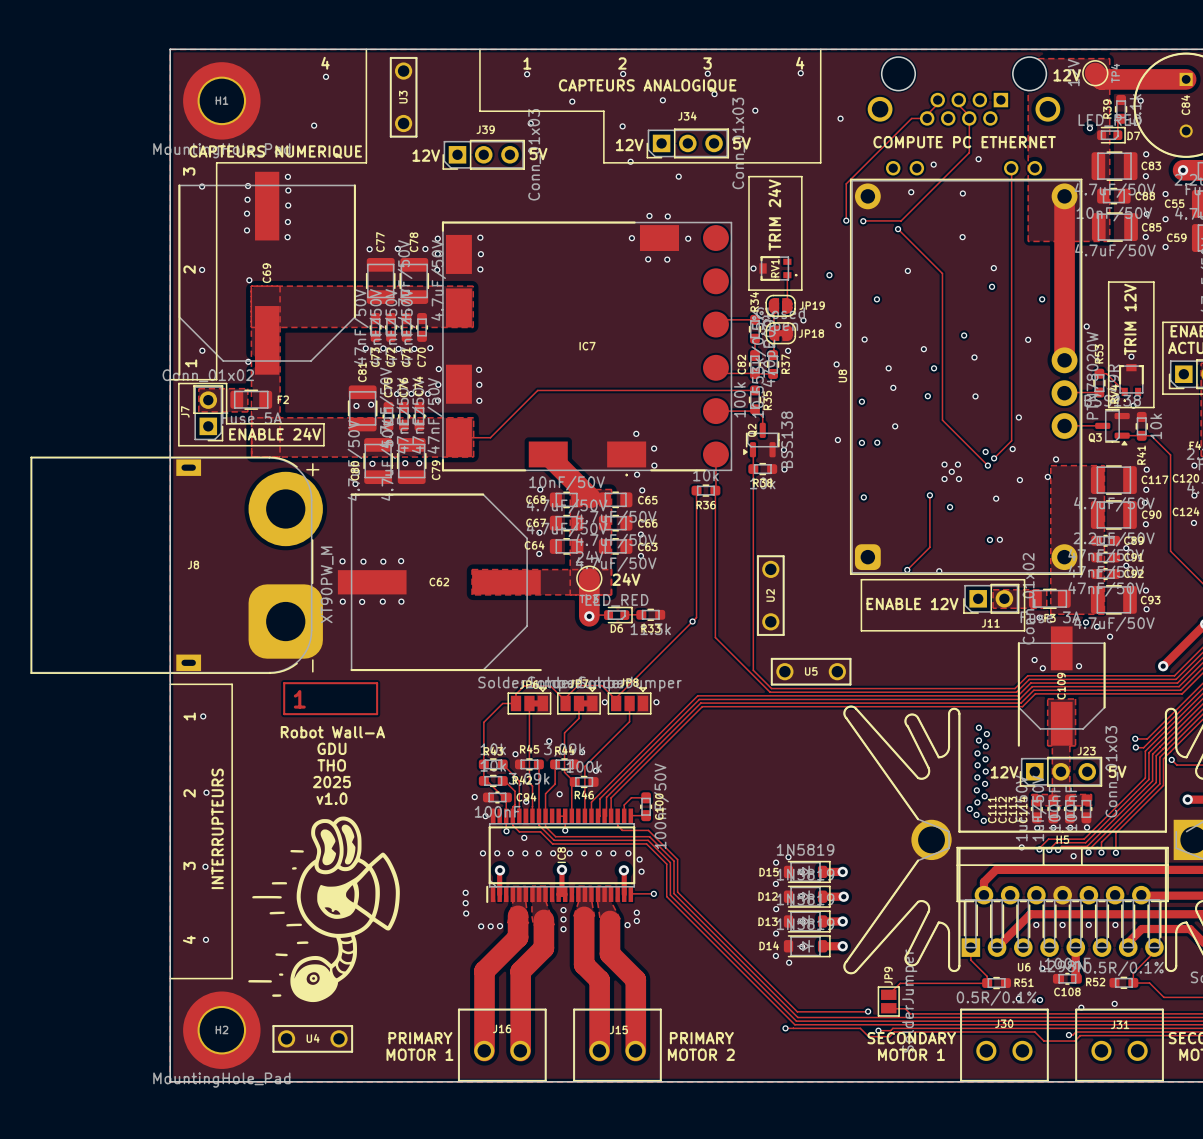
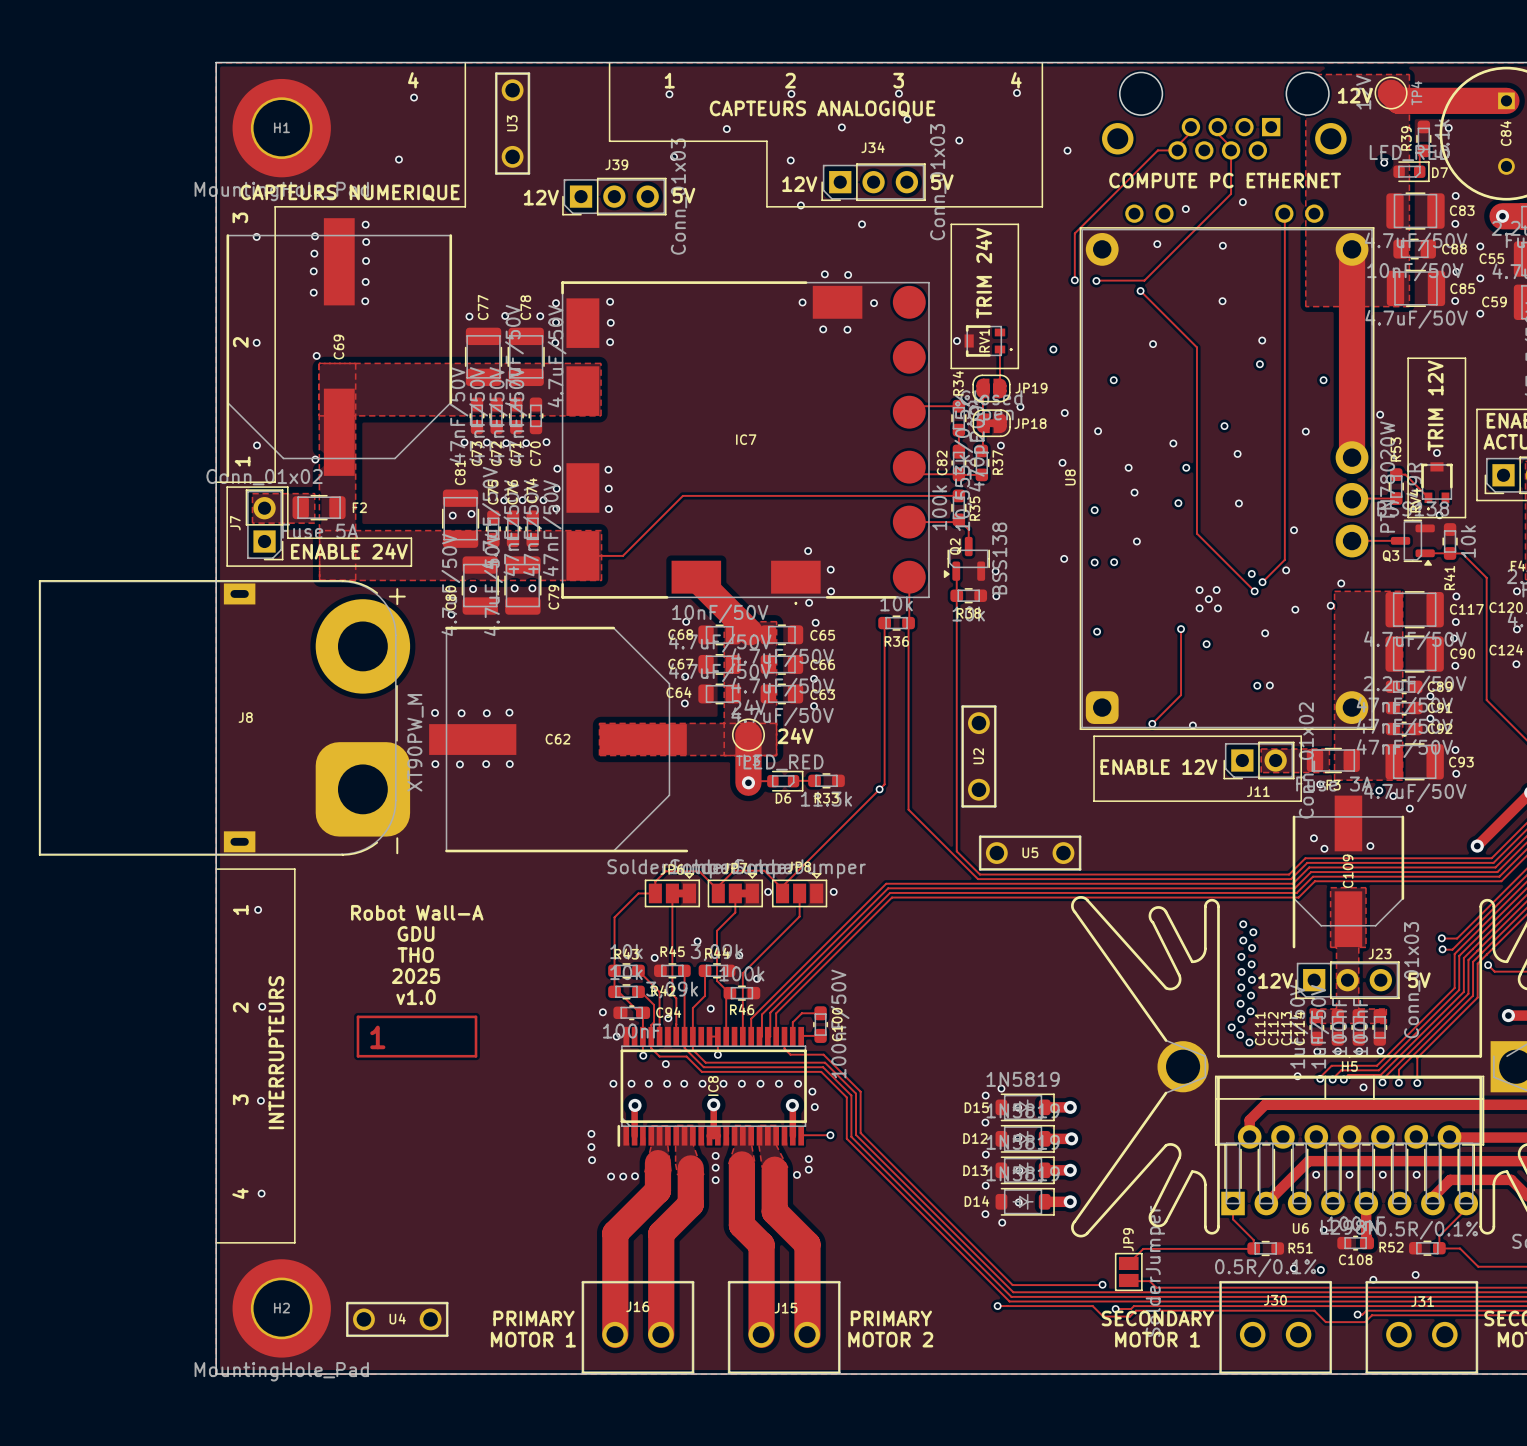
track: (284, 683) (284, 714) (377, 714) (377, 683) (284, 683) -> (357, 1016) (357, 1056) (476, 1056) (476, 1016) (357, 1016)
text position: 1 (299, 699) -> 1 (377, 1037)
text: none -> Robot Wall-A (417, 912)
text: Robot Wall-A (332, 732) -> GDU (416, 933)
text: GDU (331, 748) -> THO (415, 955)
text: THO (331, 765) -> 2025 (416, 976)
text: 2025 (331, 782) -> v1.0 (416, 997)
text: v1.0 (331, 798) -> none
drawing: [248, 816, 400, 1003] -> none

